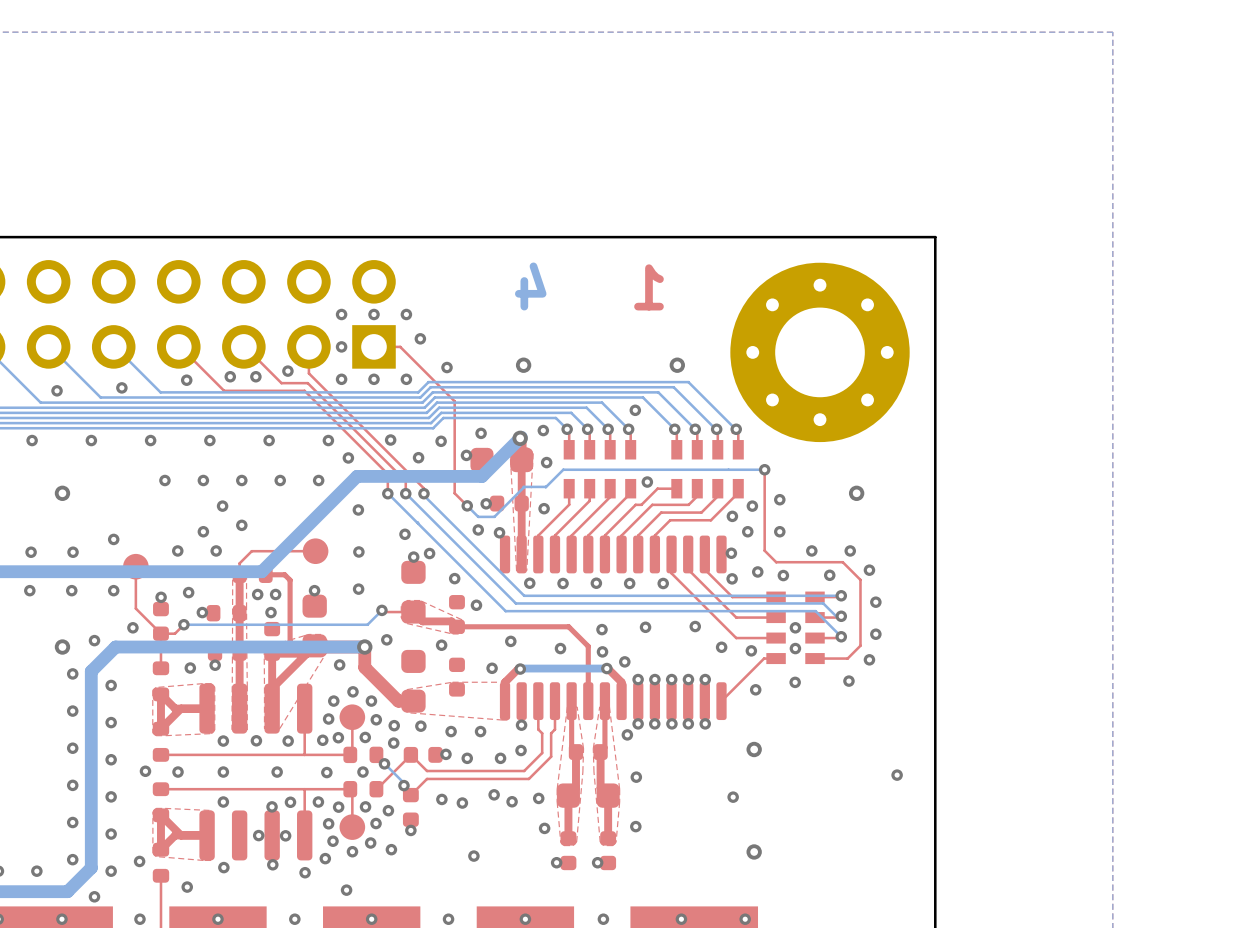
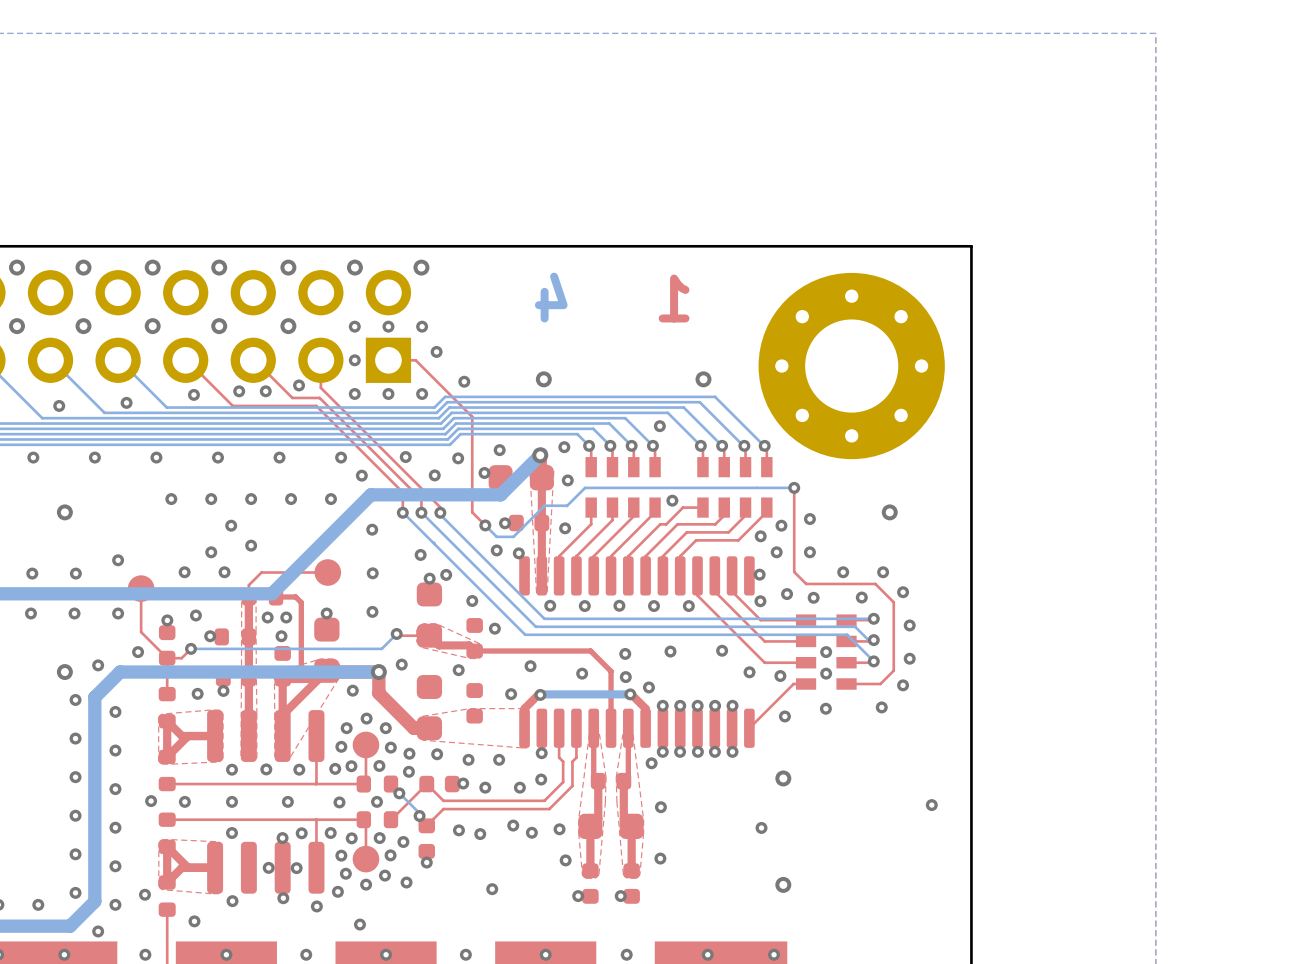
via: none -> (16, 267)
via: none -> (83, 267)
via: none -> (152, 267)
via: none -> (219, 267)
via: none -> (288, 267)
via: none -> (354, 267)
via: none -> (421, 267)
via: none -> (16, 326)
via: none -> (83, 326)
via: none -> (152, 326)
via: none -> (219, 326)
via: none -> (288, 326)

